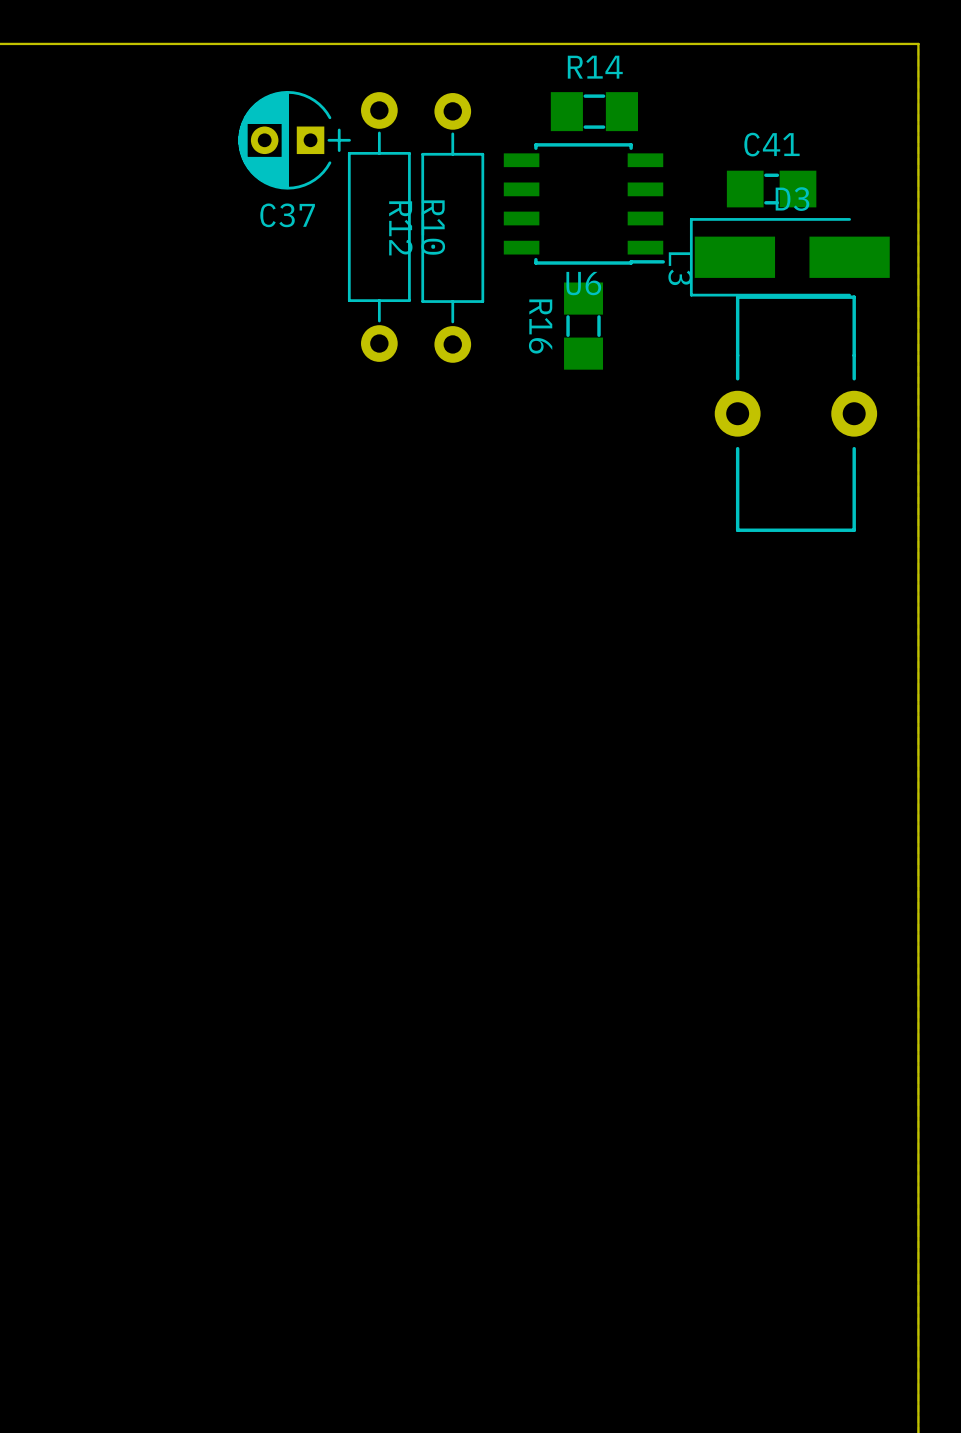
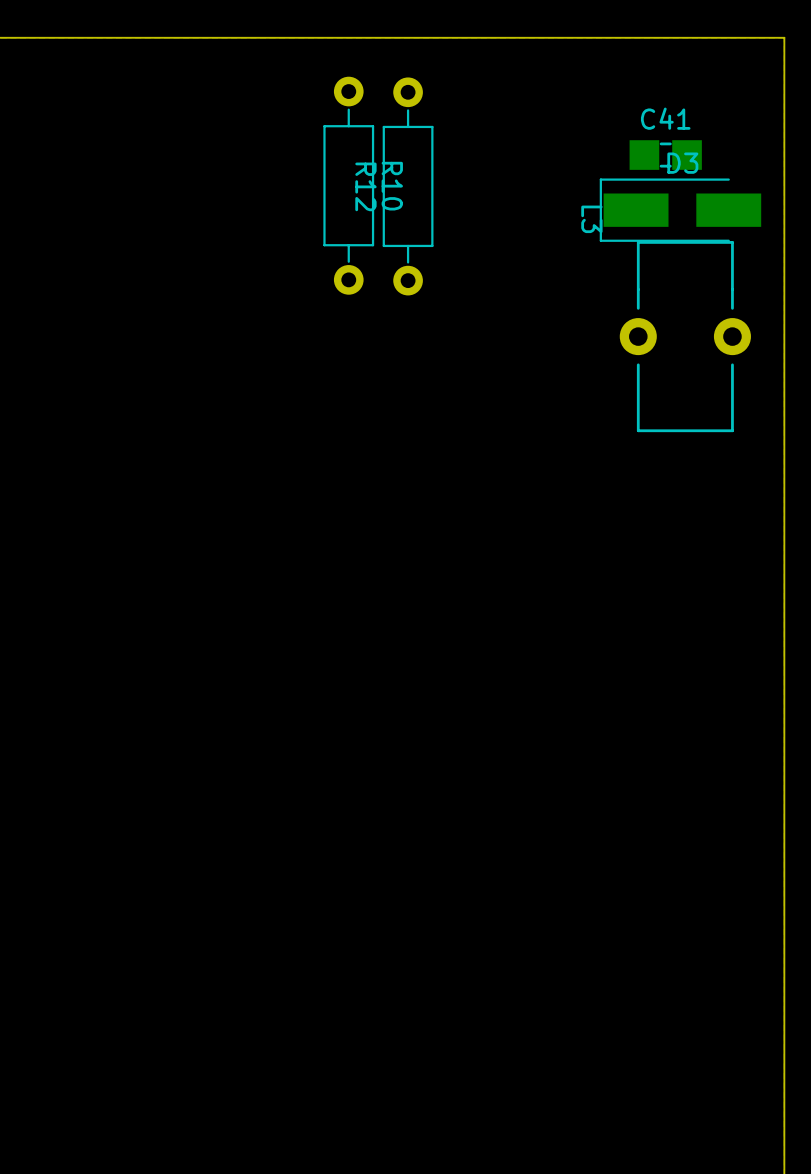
R14: (594, 111) -> none
C37: (294, 140) -> none
U6: (584, 203) -> none
R16: (583, 326) -> none

